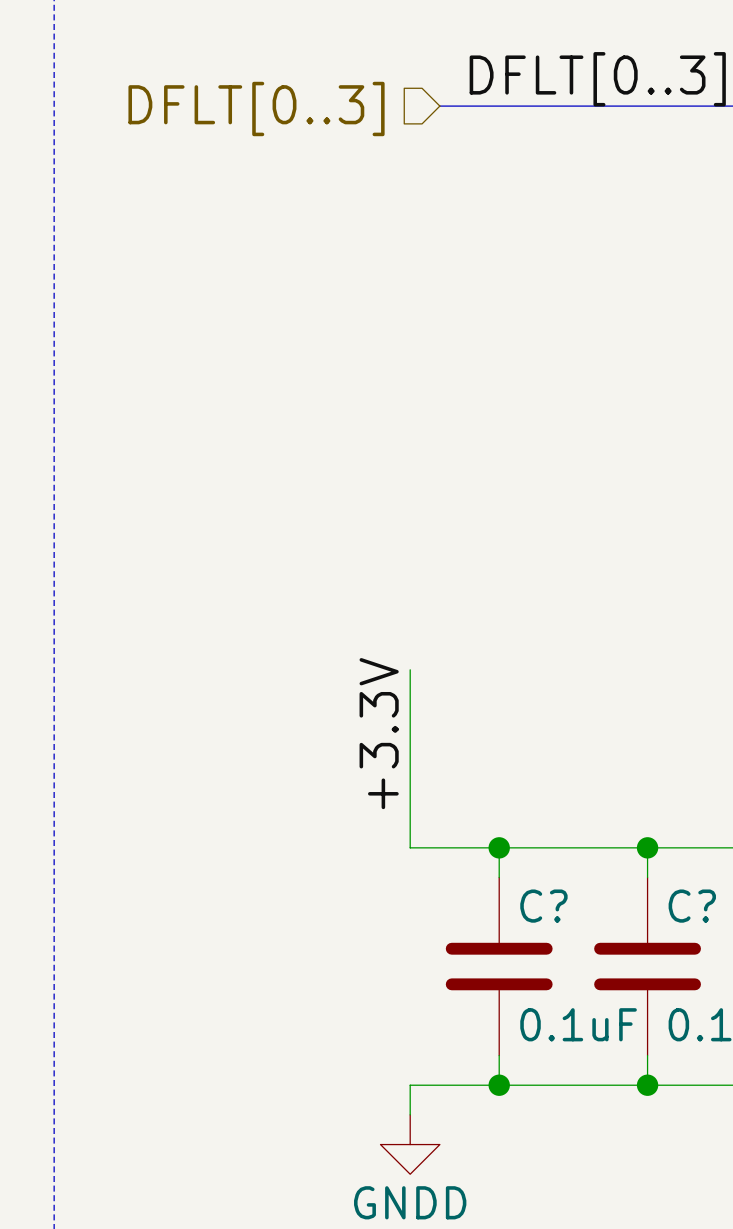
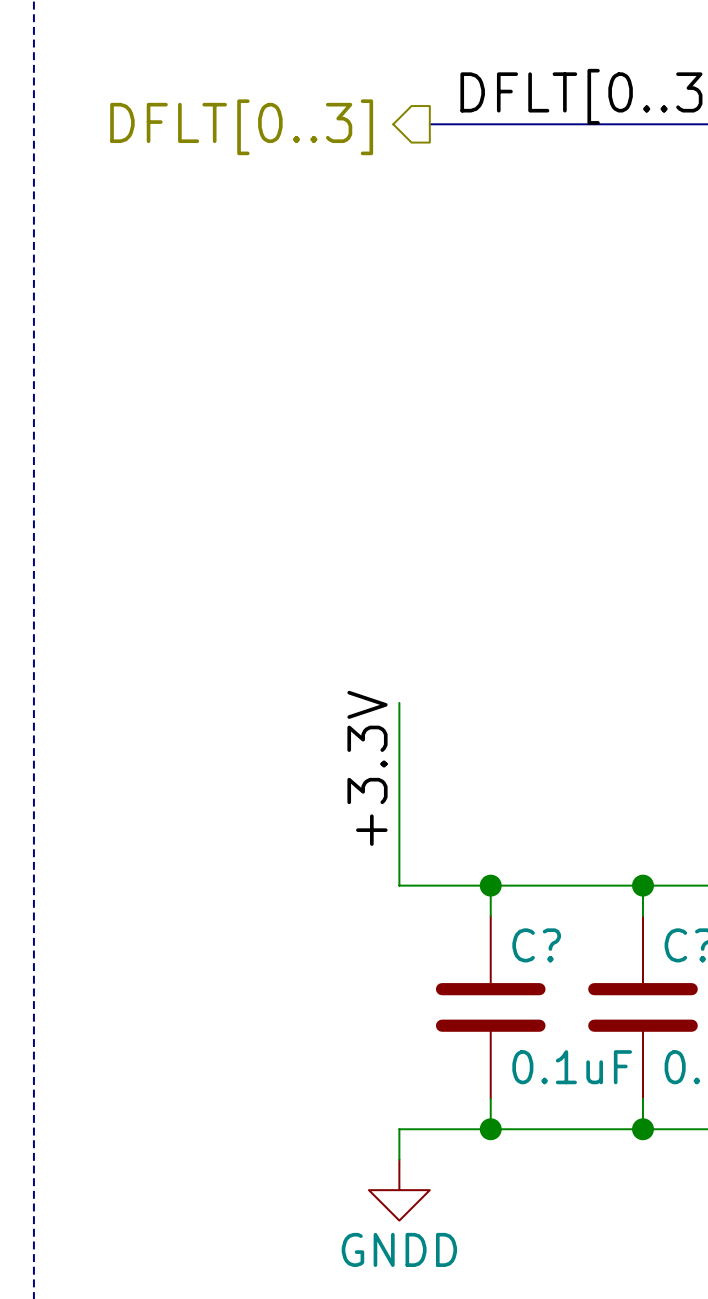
hierarchical label shape: input (256, 108) -> output (241, 127)

